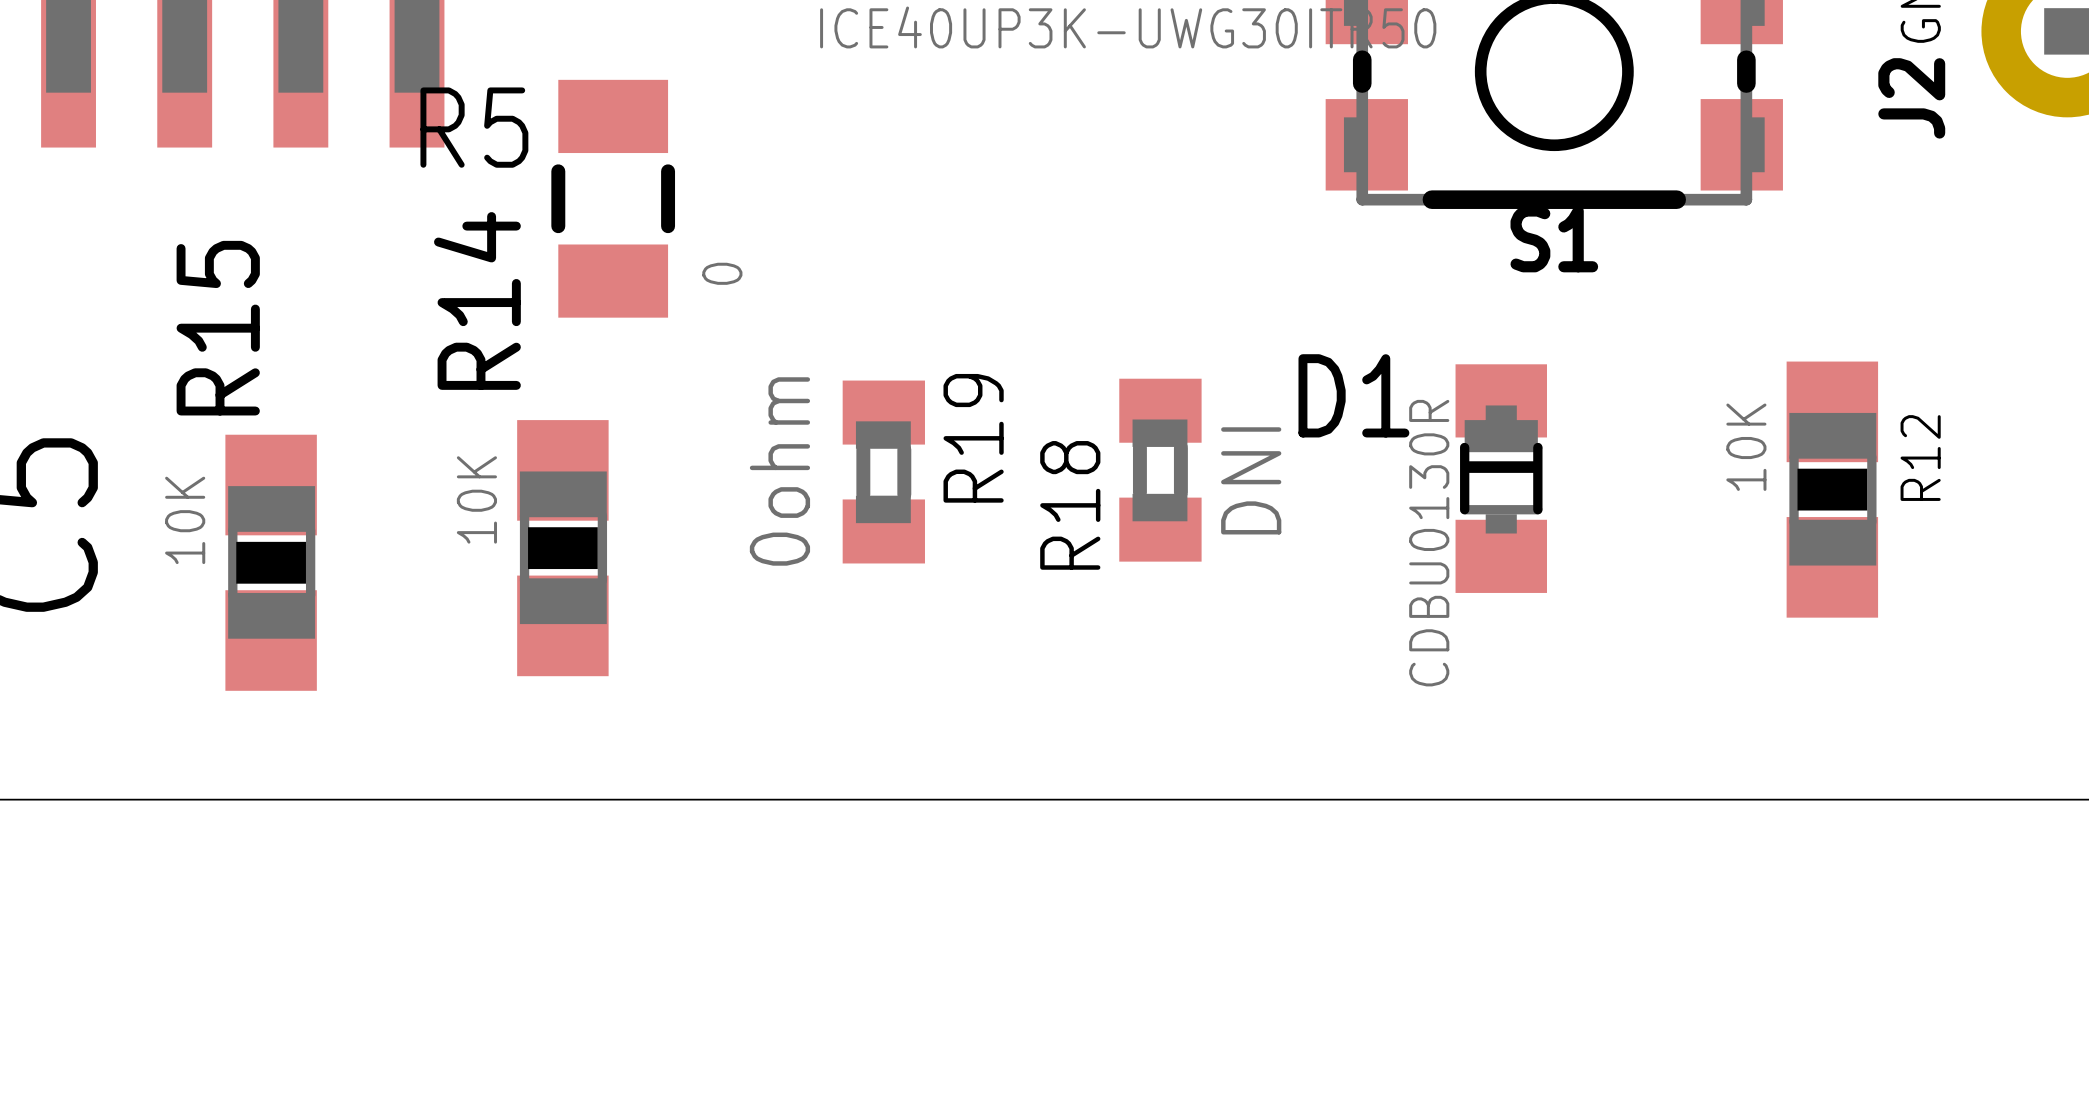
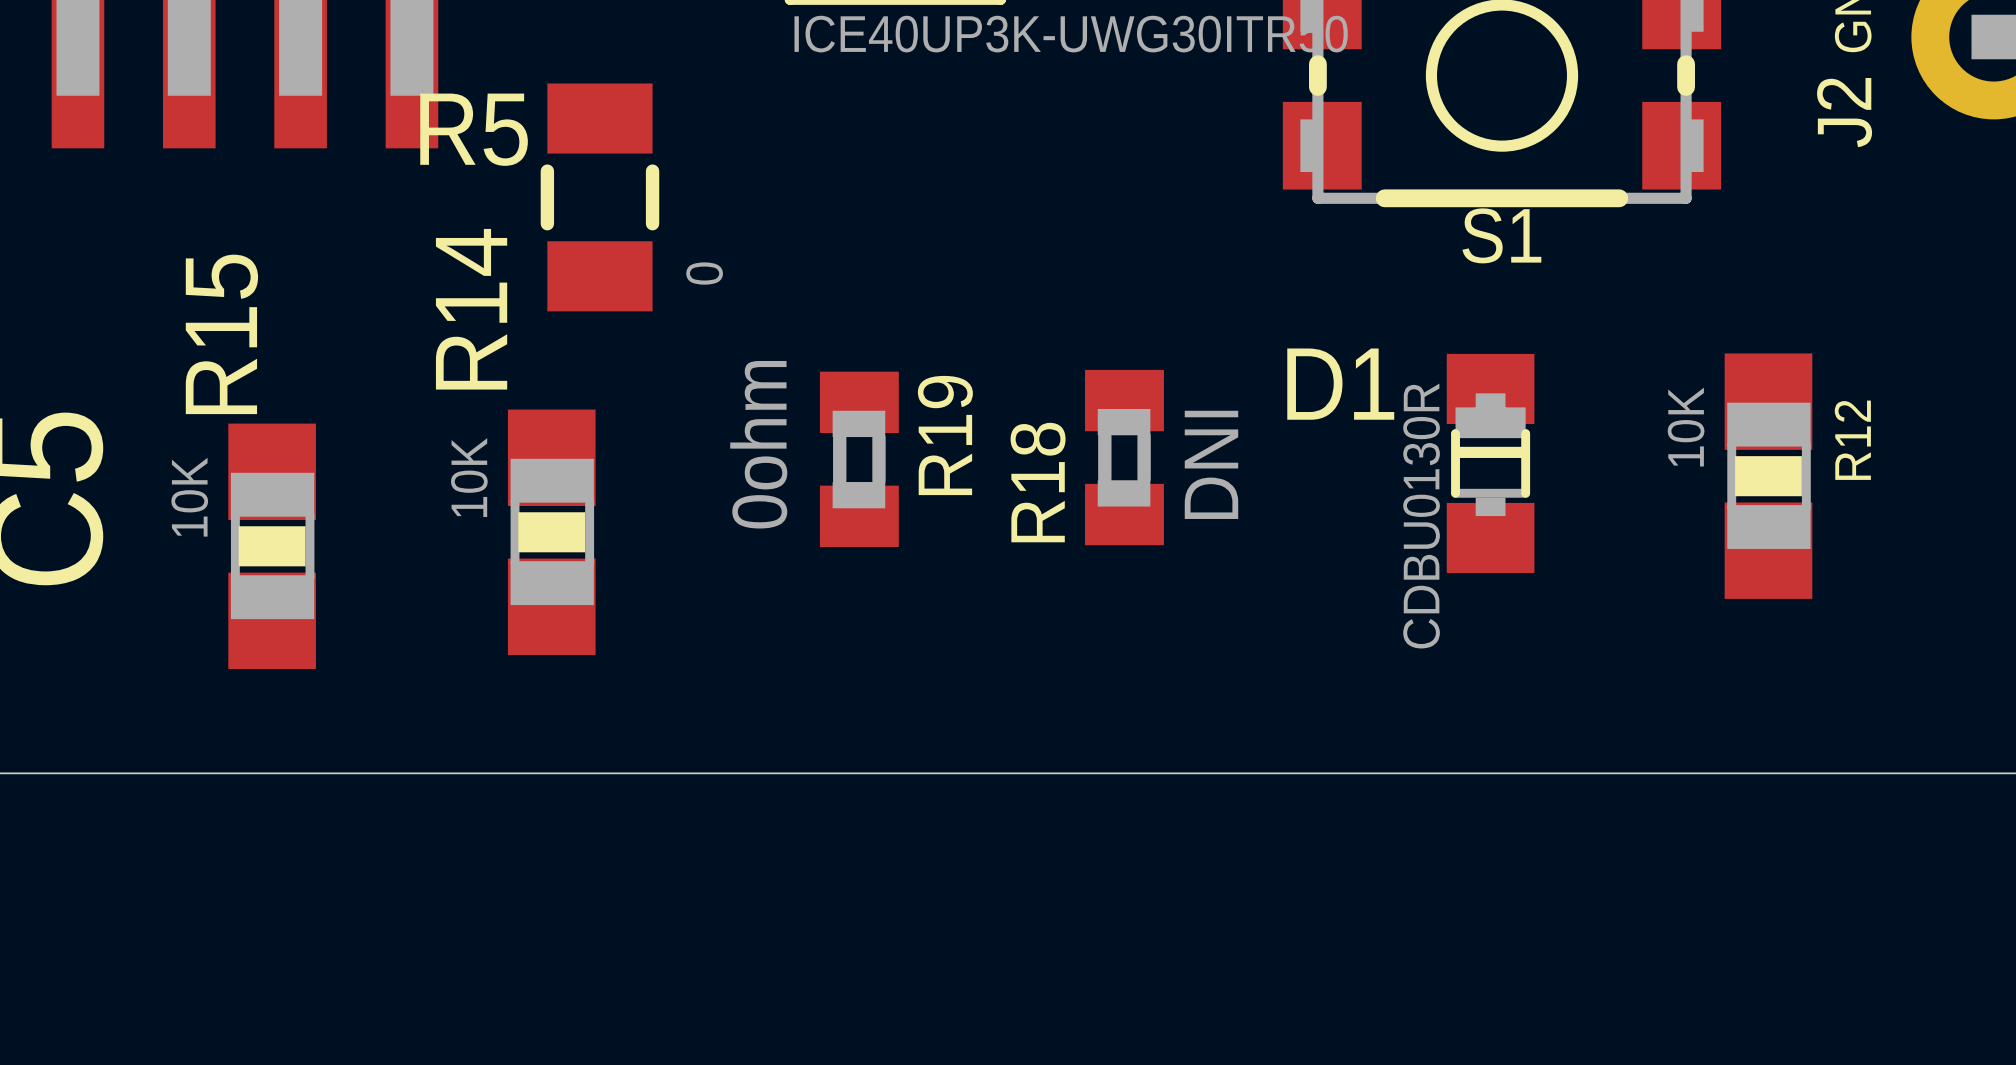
D1 position: (1501, 478) -> (1490, 463)

